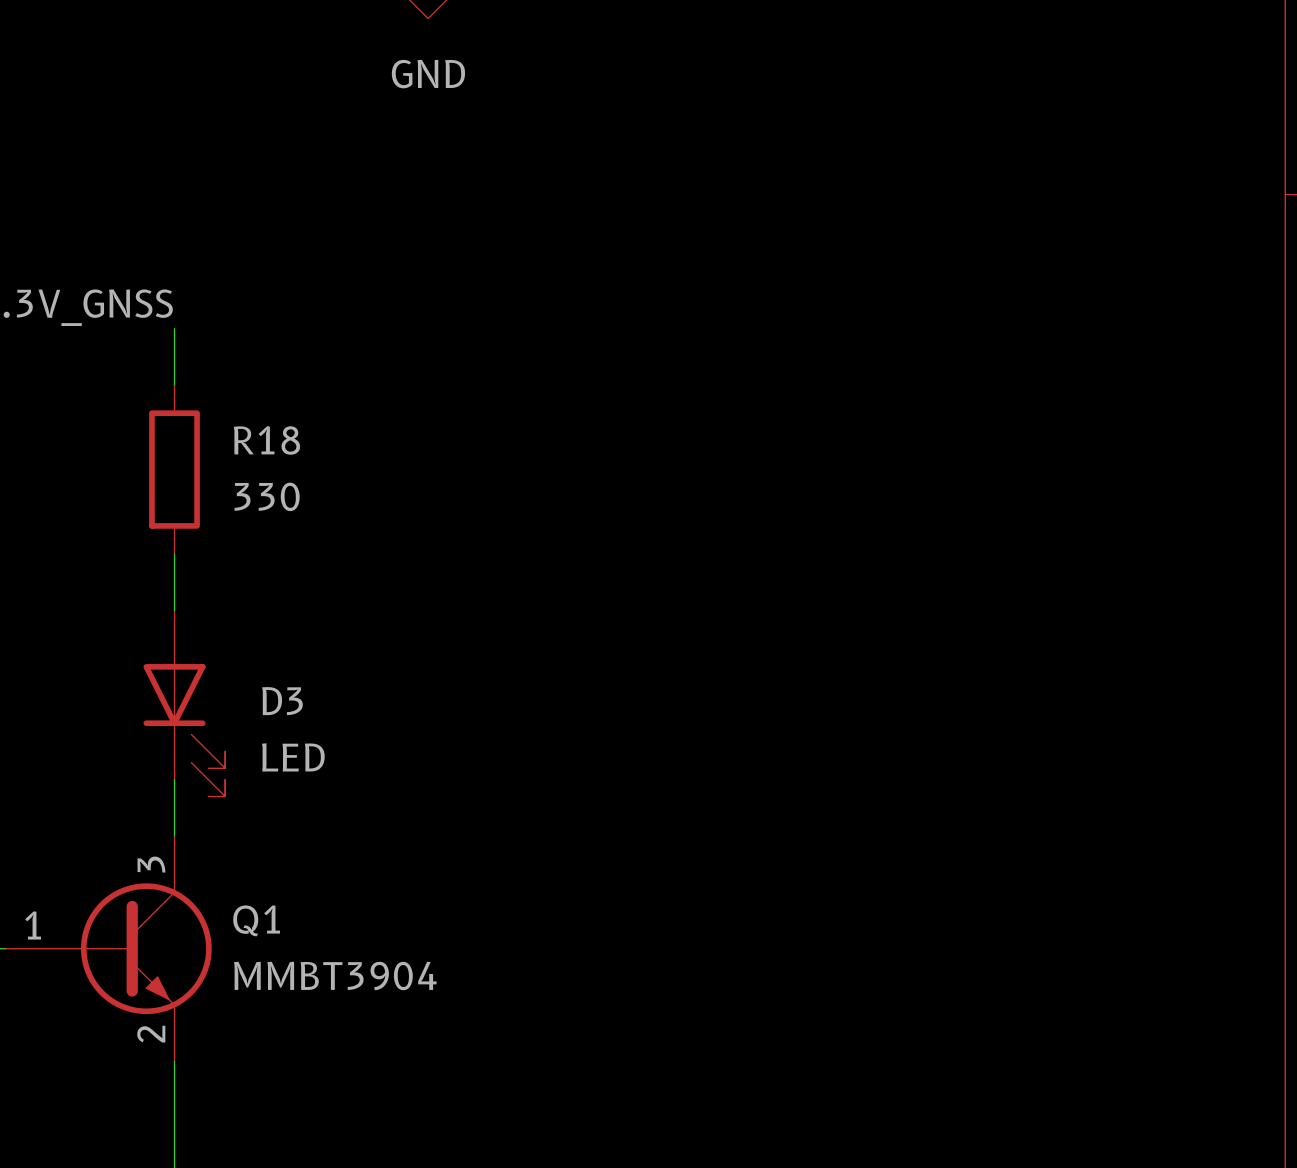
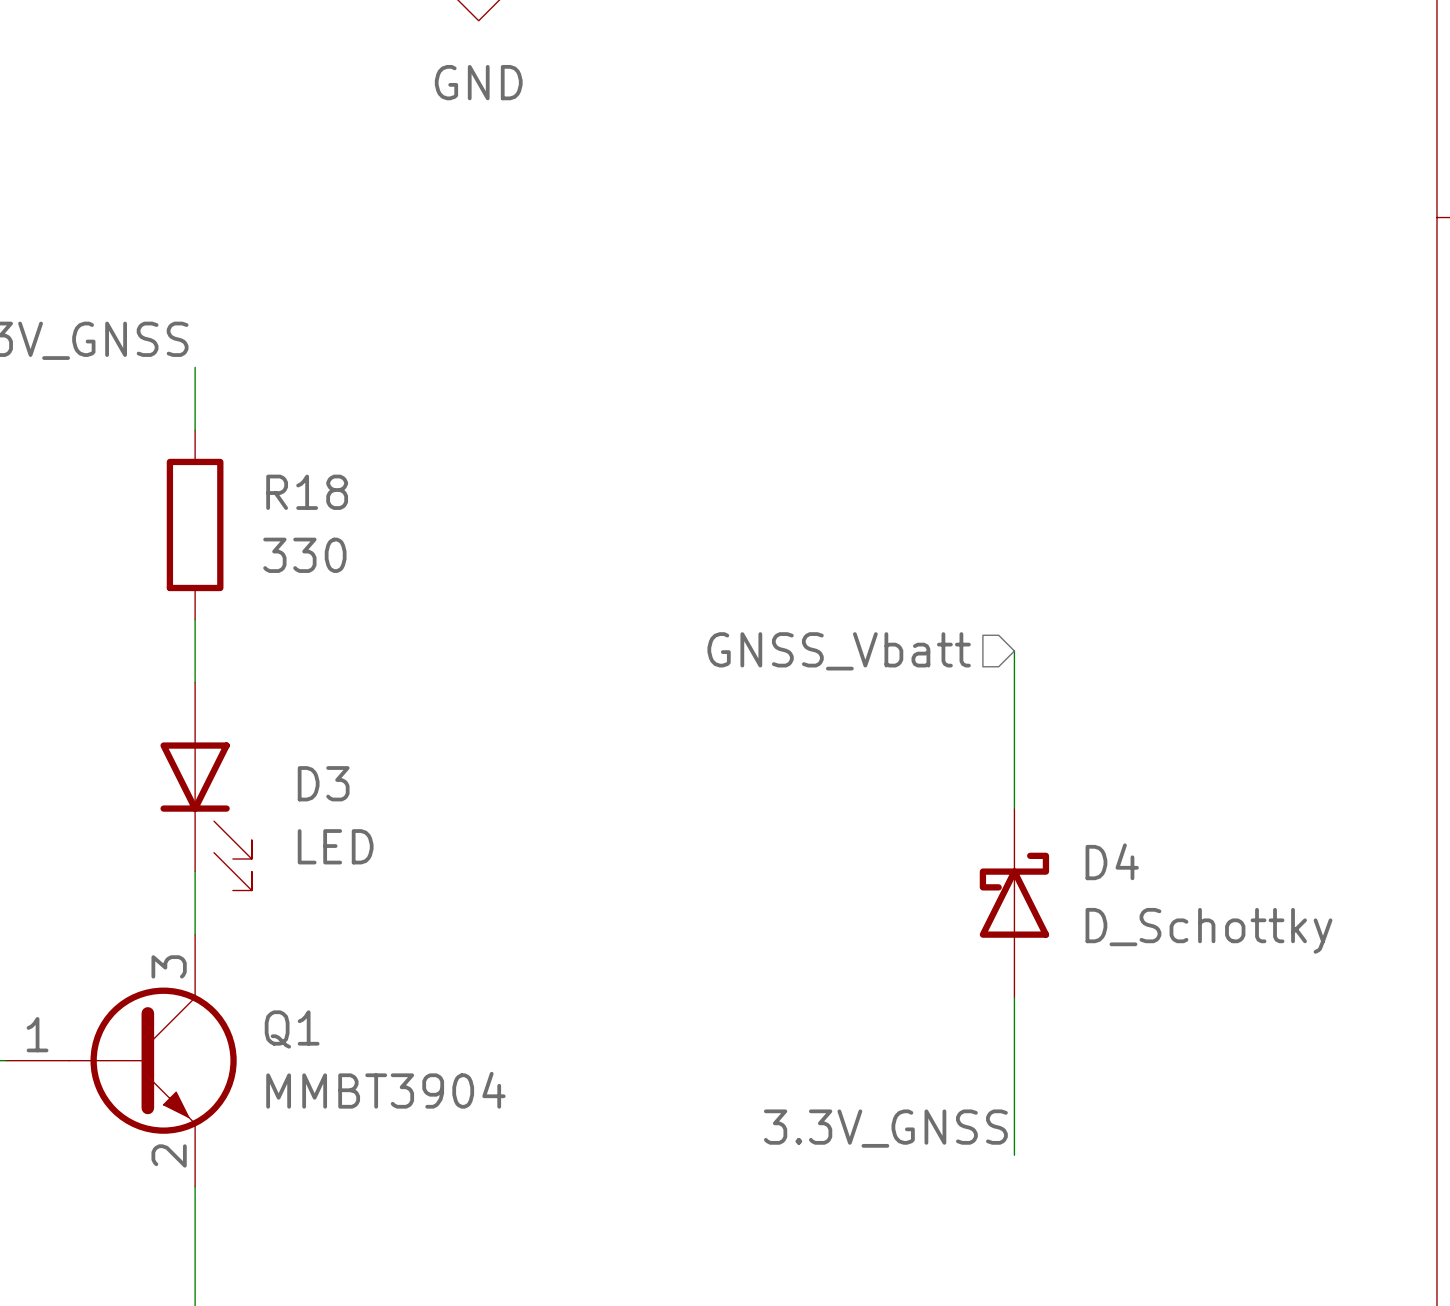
wire: none -> (1014, 651) (1014, 808)
hierarchical label: none -> GNSS_Vbatt (839, 651)
D4: none -> D_Schottky (1014, 903)
wire: none -> (1014, 997) (1014, 1155)
label: none -> 3.3V_GNSS (885, 1128)

